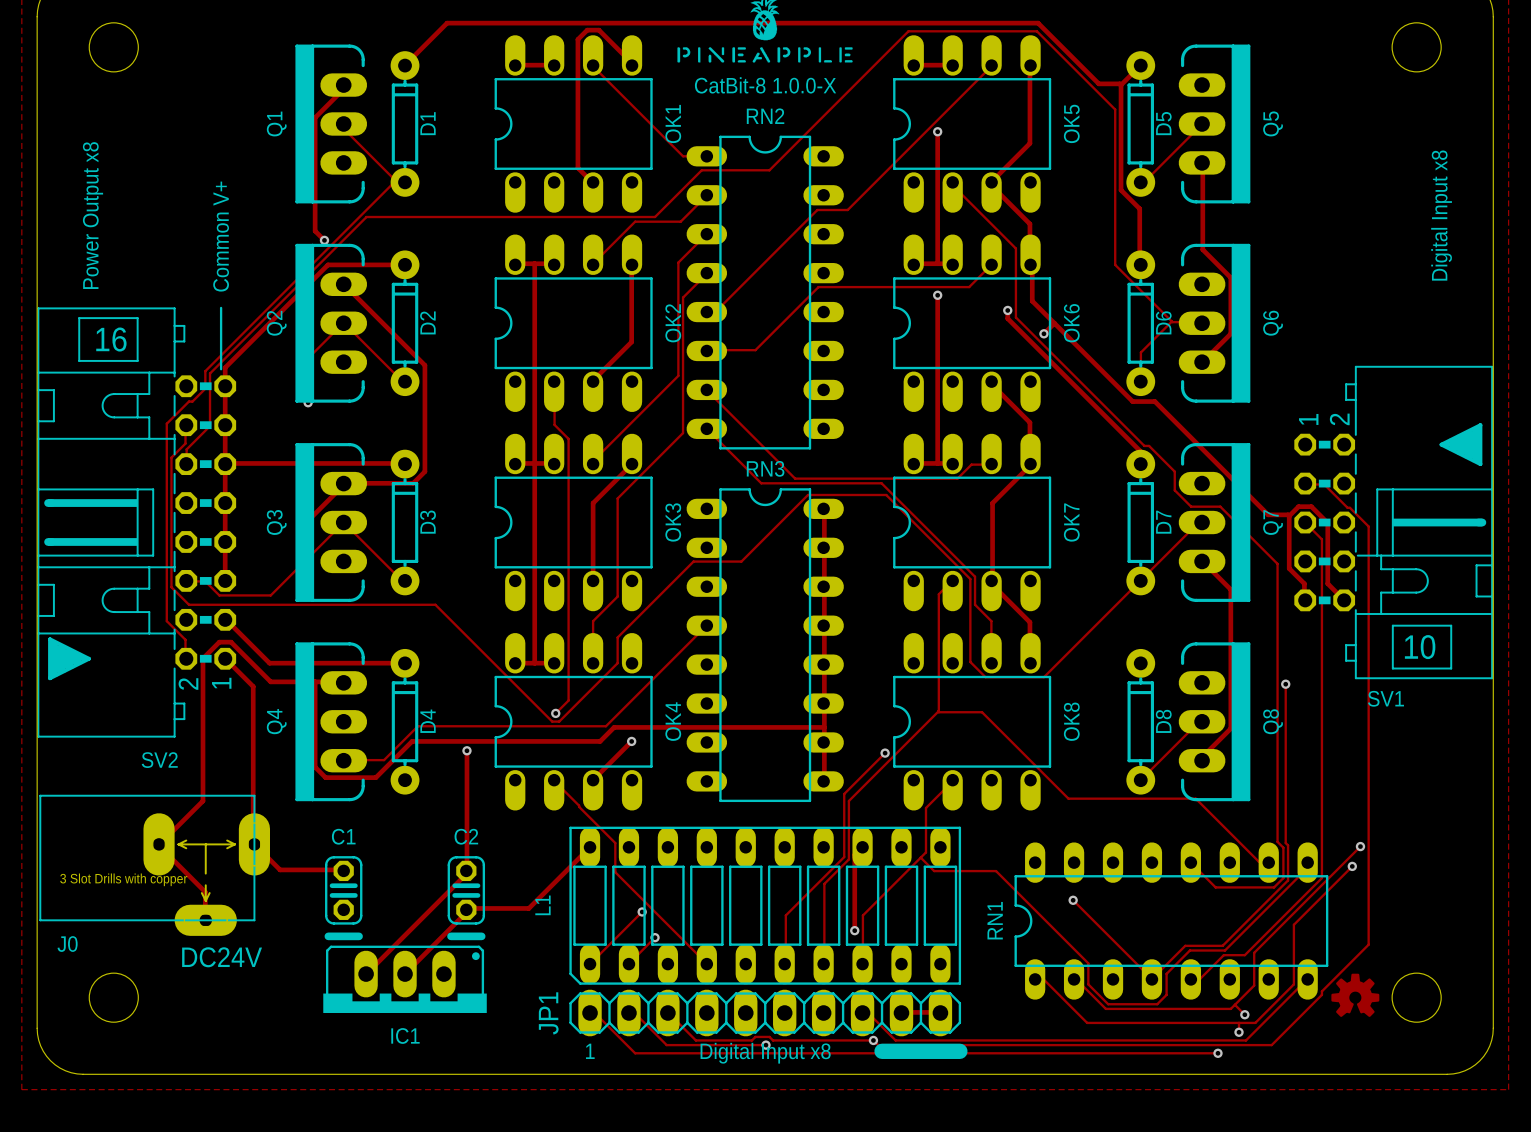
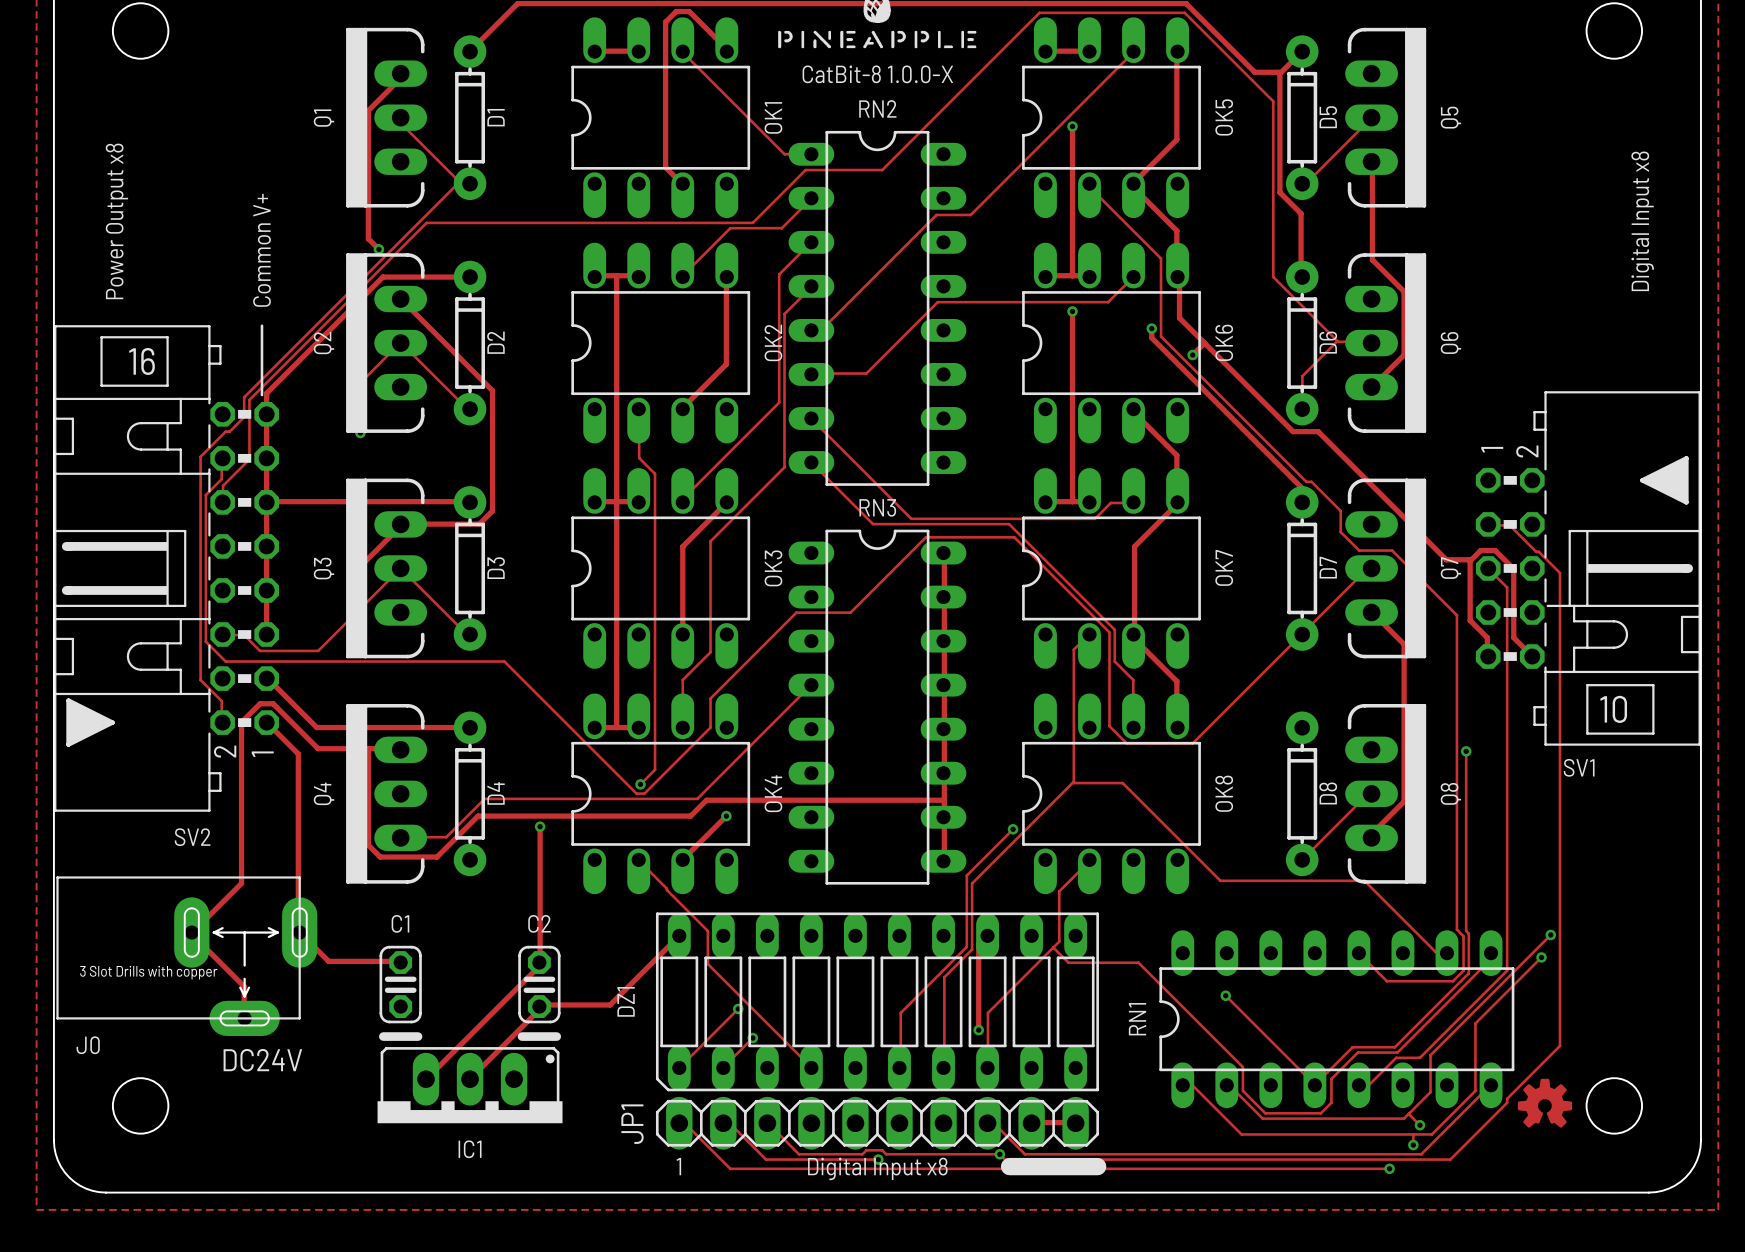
L1 name: L1 (542, 905) -> DZ1 (626, 1001)

